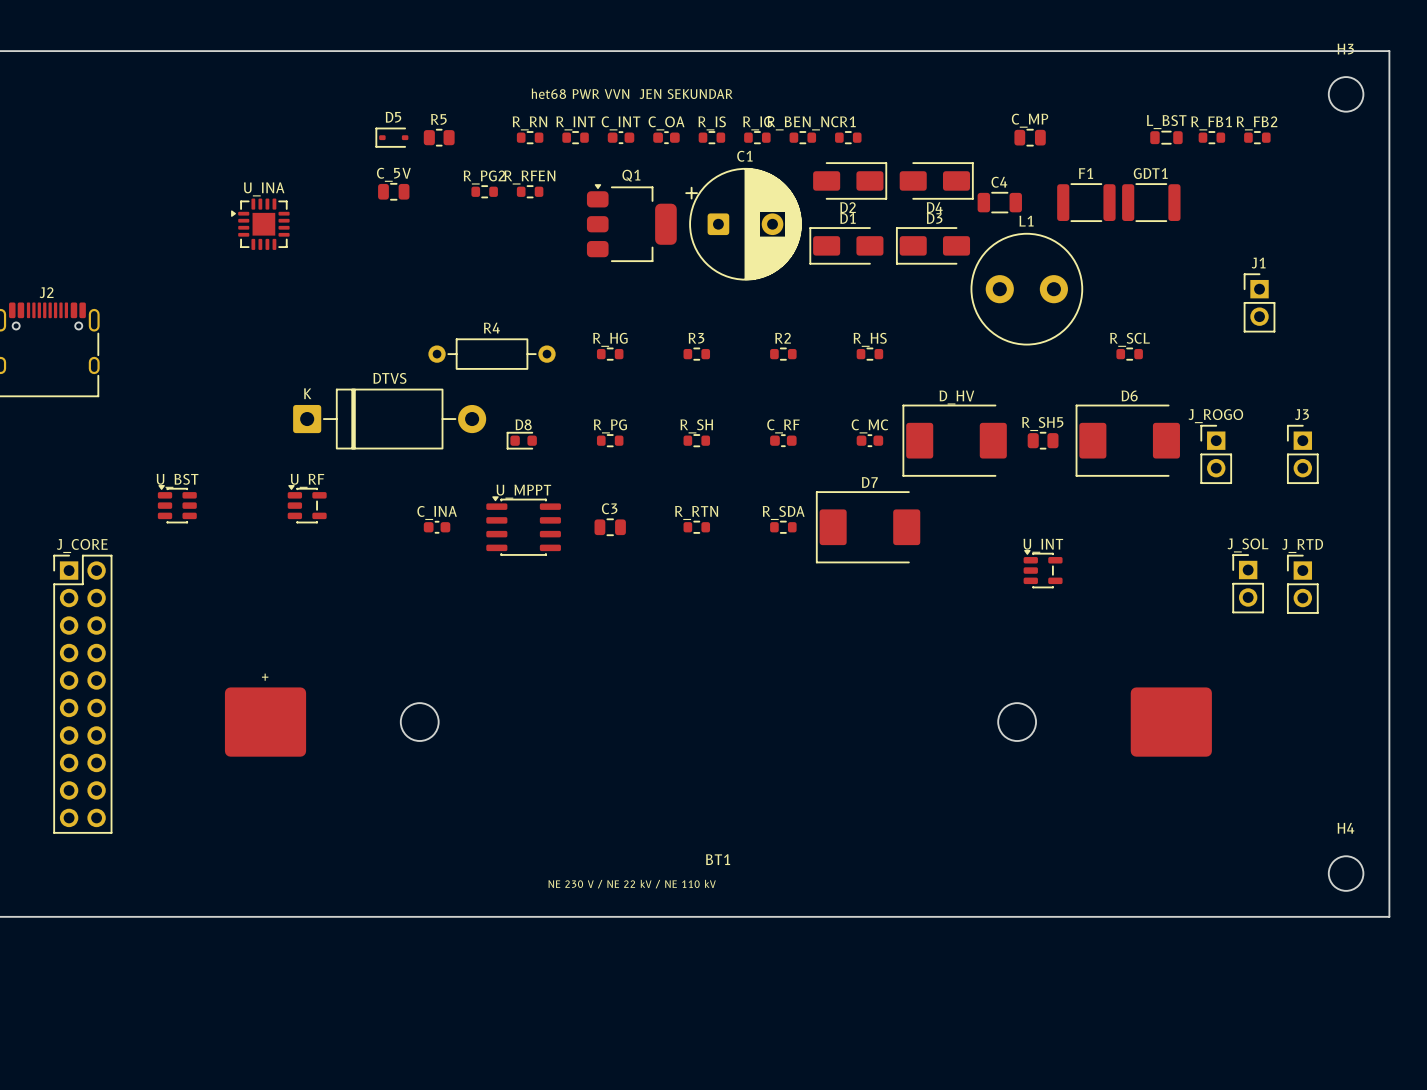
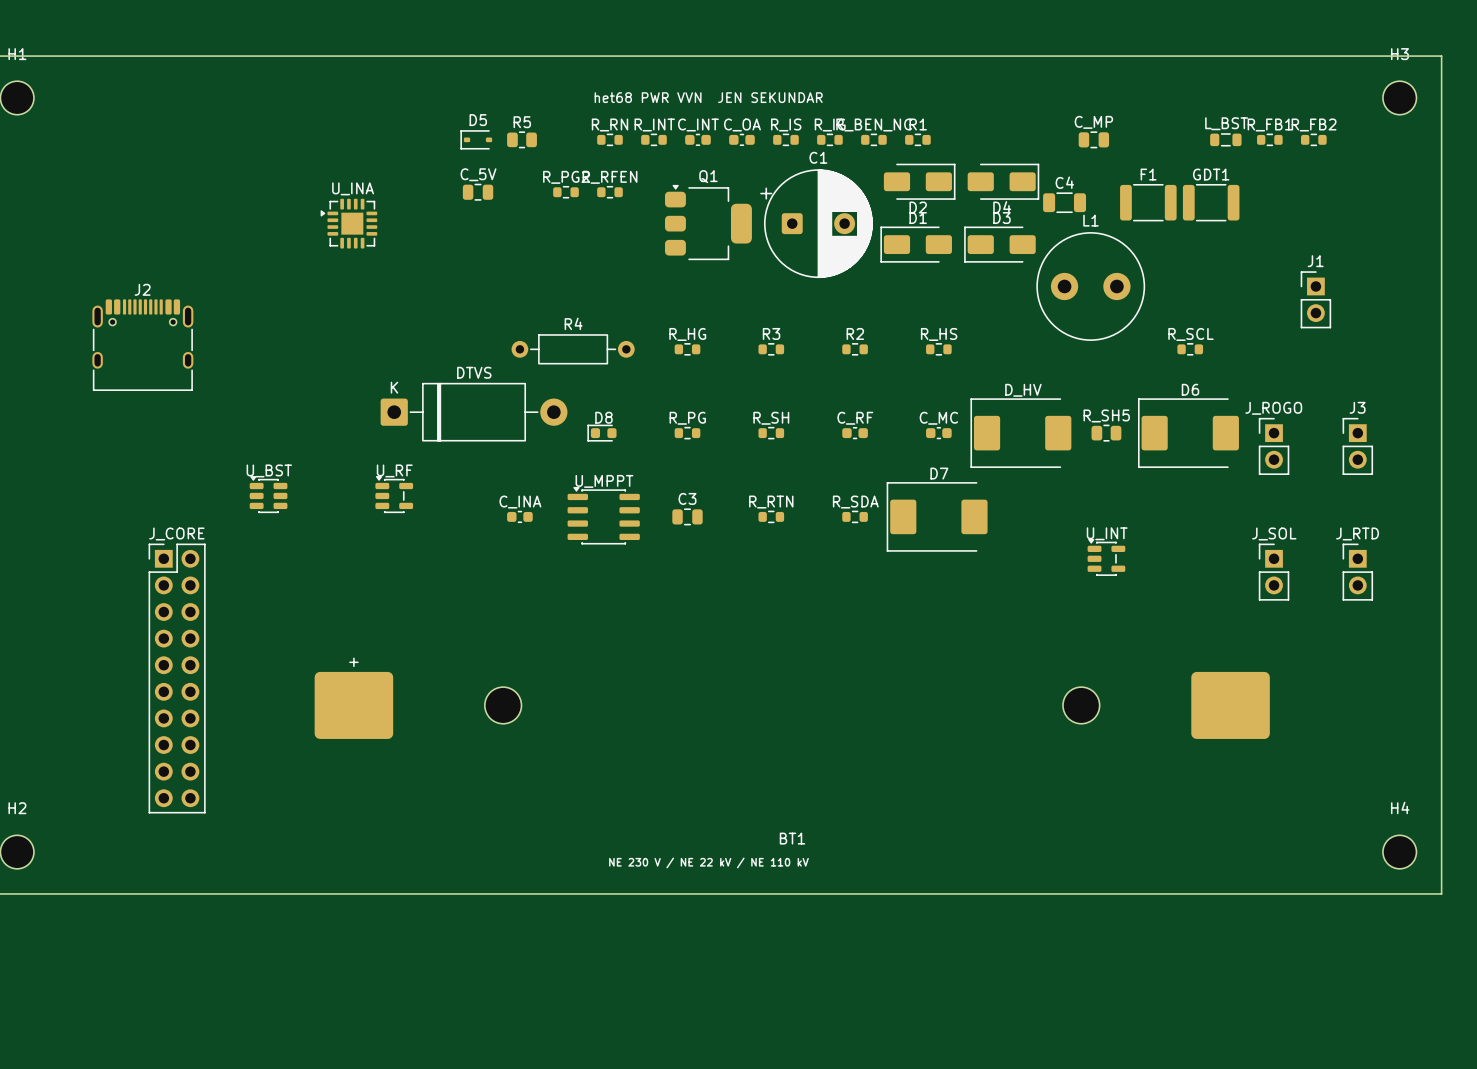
J_SOL position: (1248, 583) -> (1274, 572)

